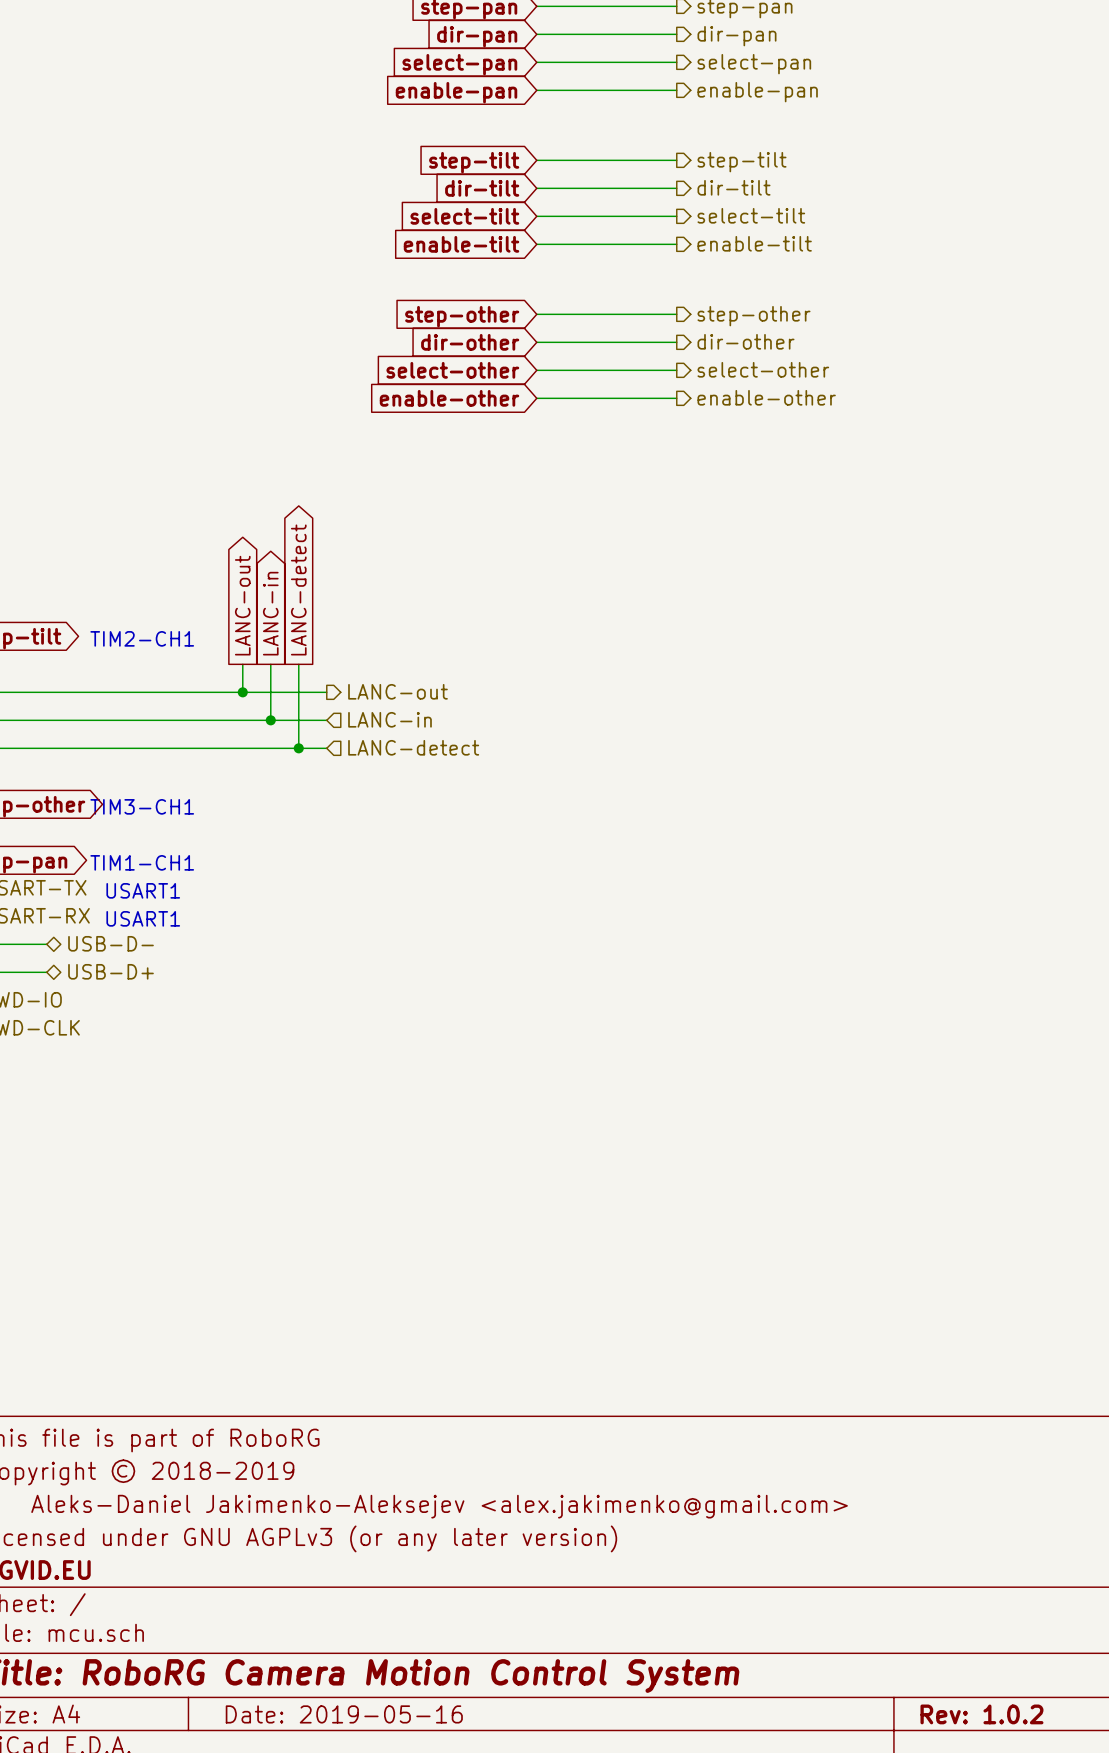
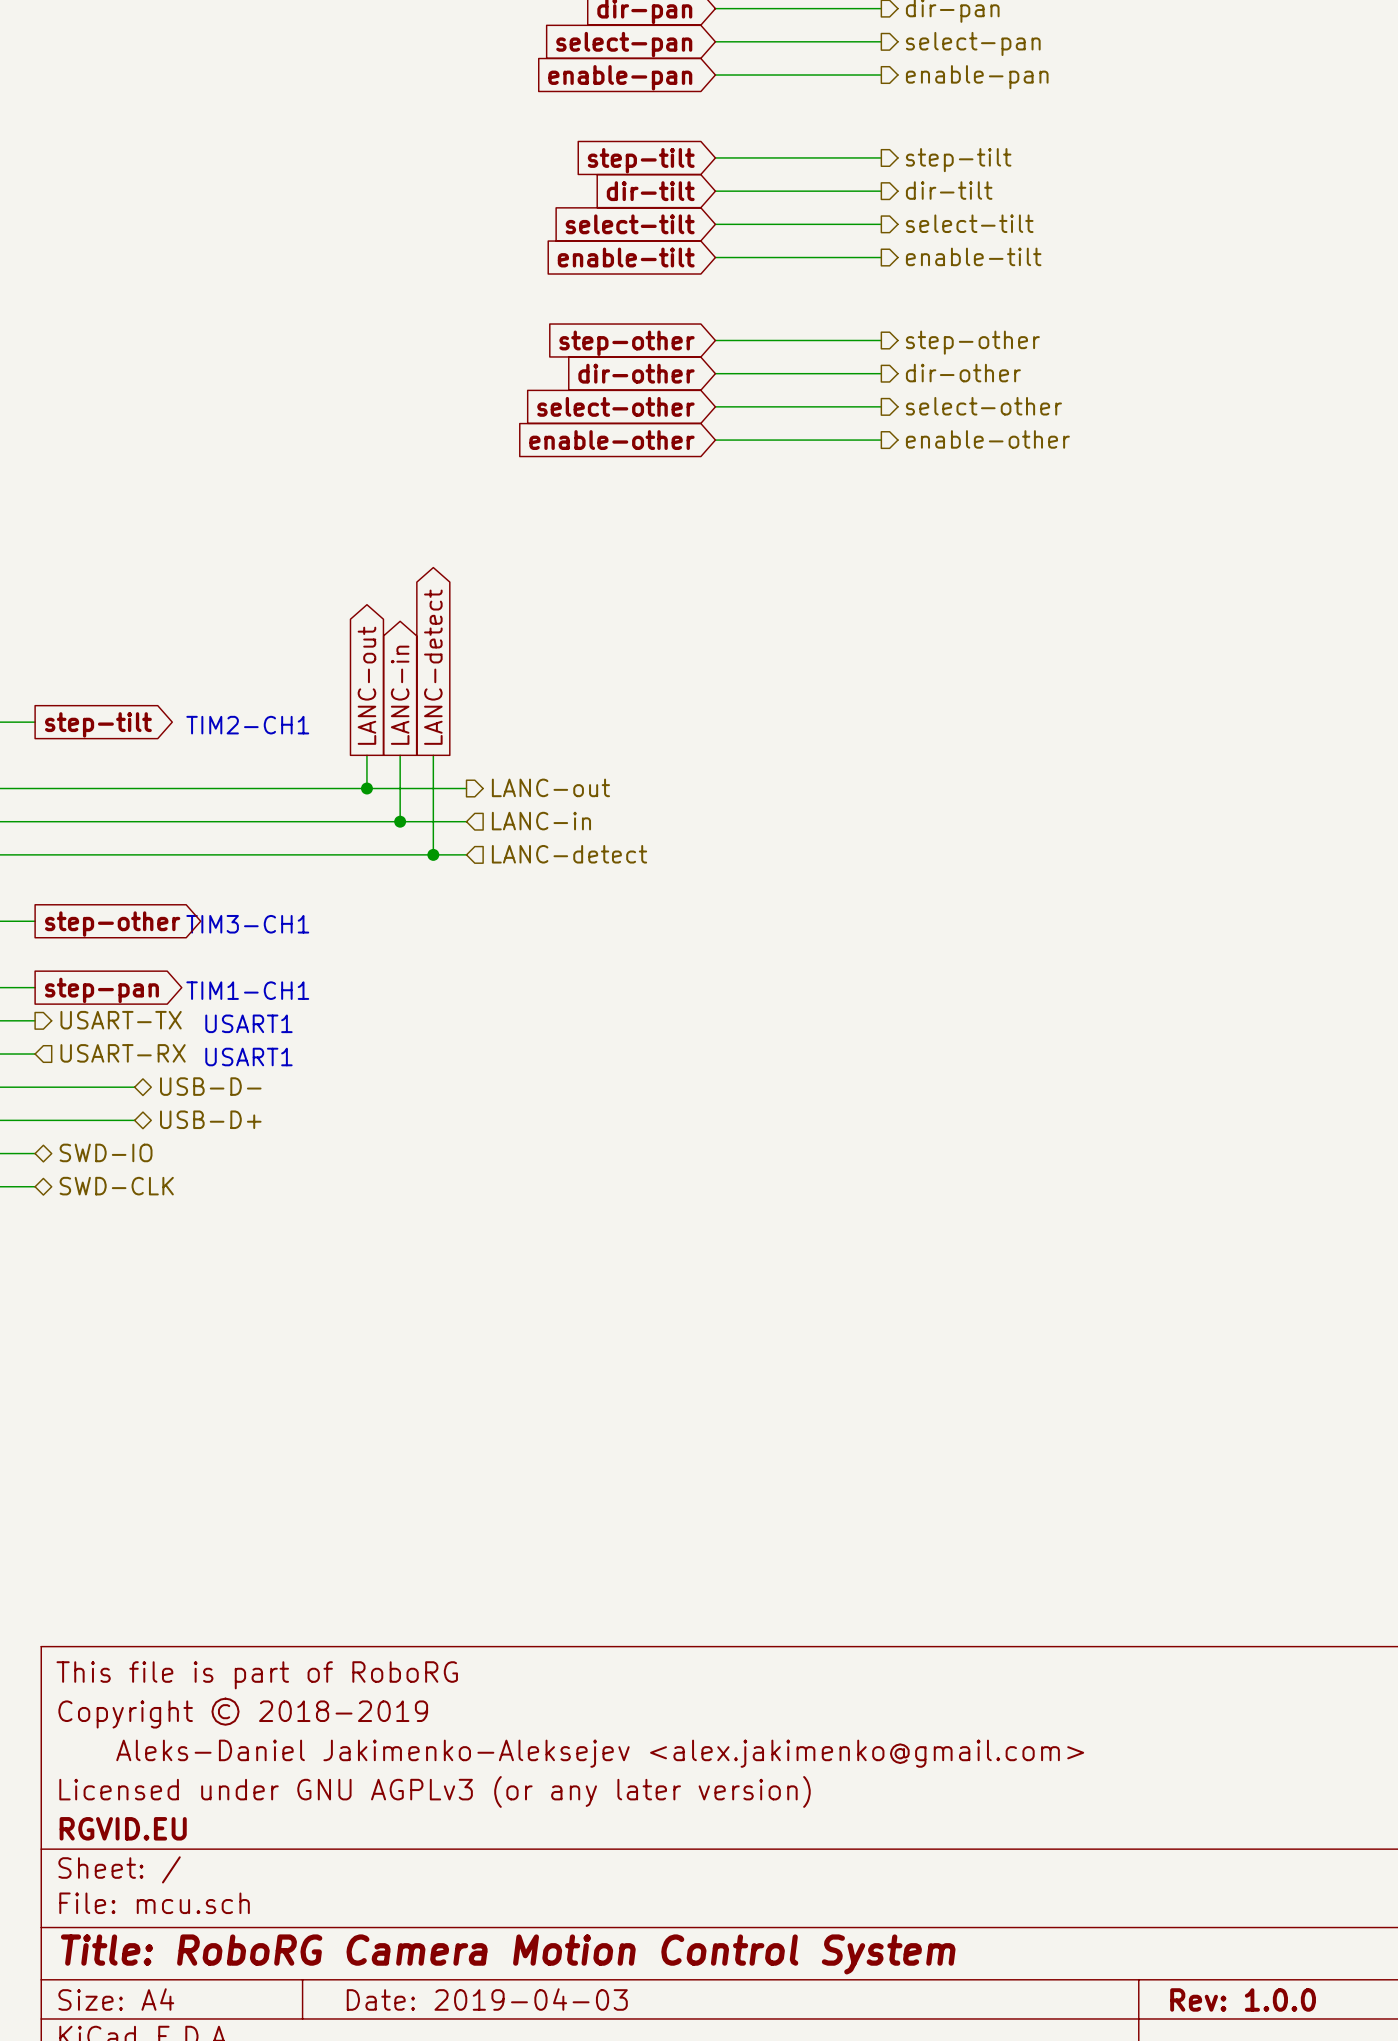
title block: Date: 2019-05-16 (344, 1714) -> Date: 2019-04-03 (487, 1999)
title block: Rev: 1.0.2 (981, 1714) -> Rev: 1.0.0 (1243, 1999)

